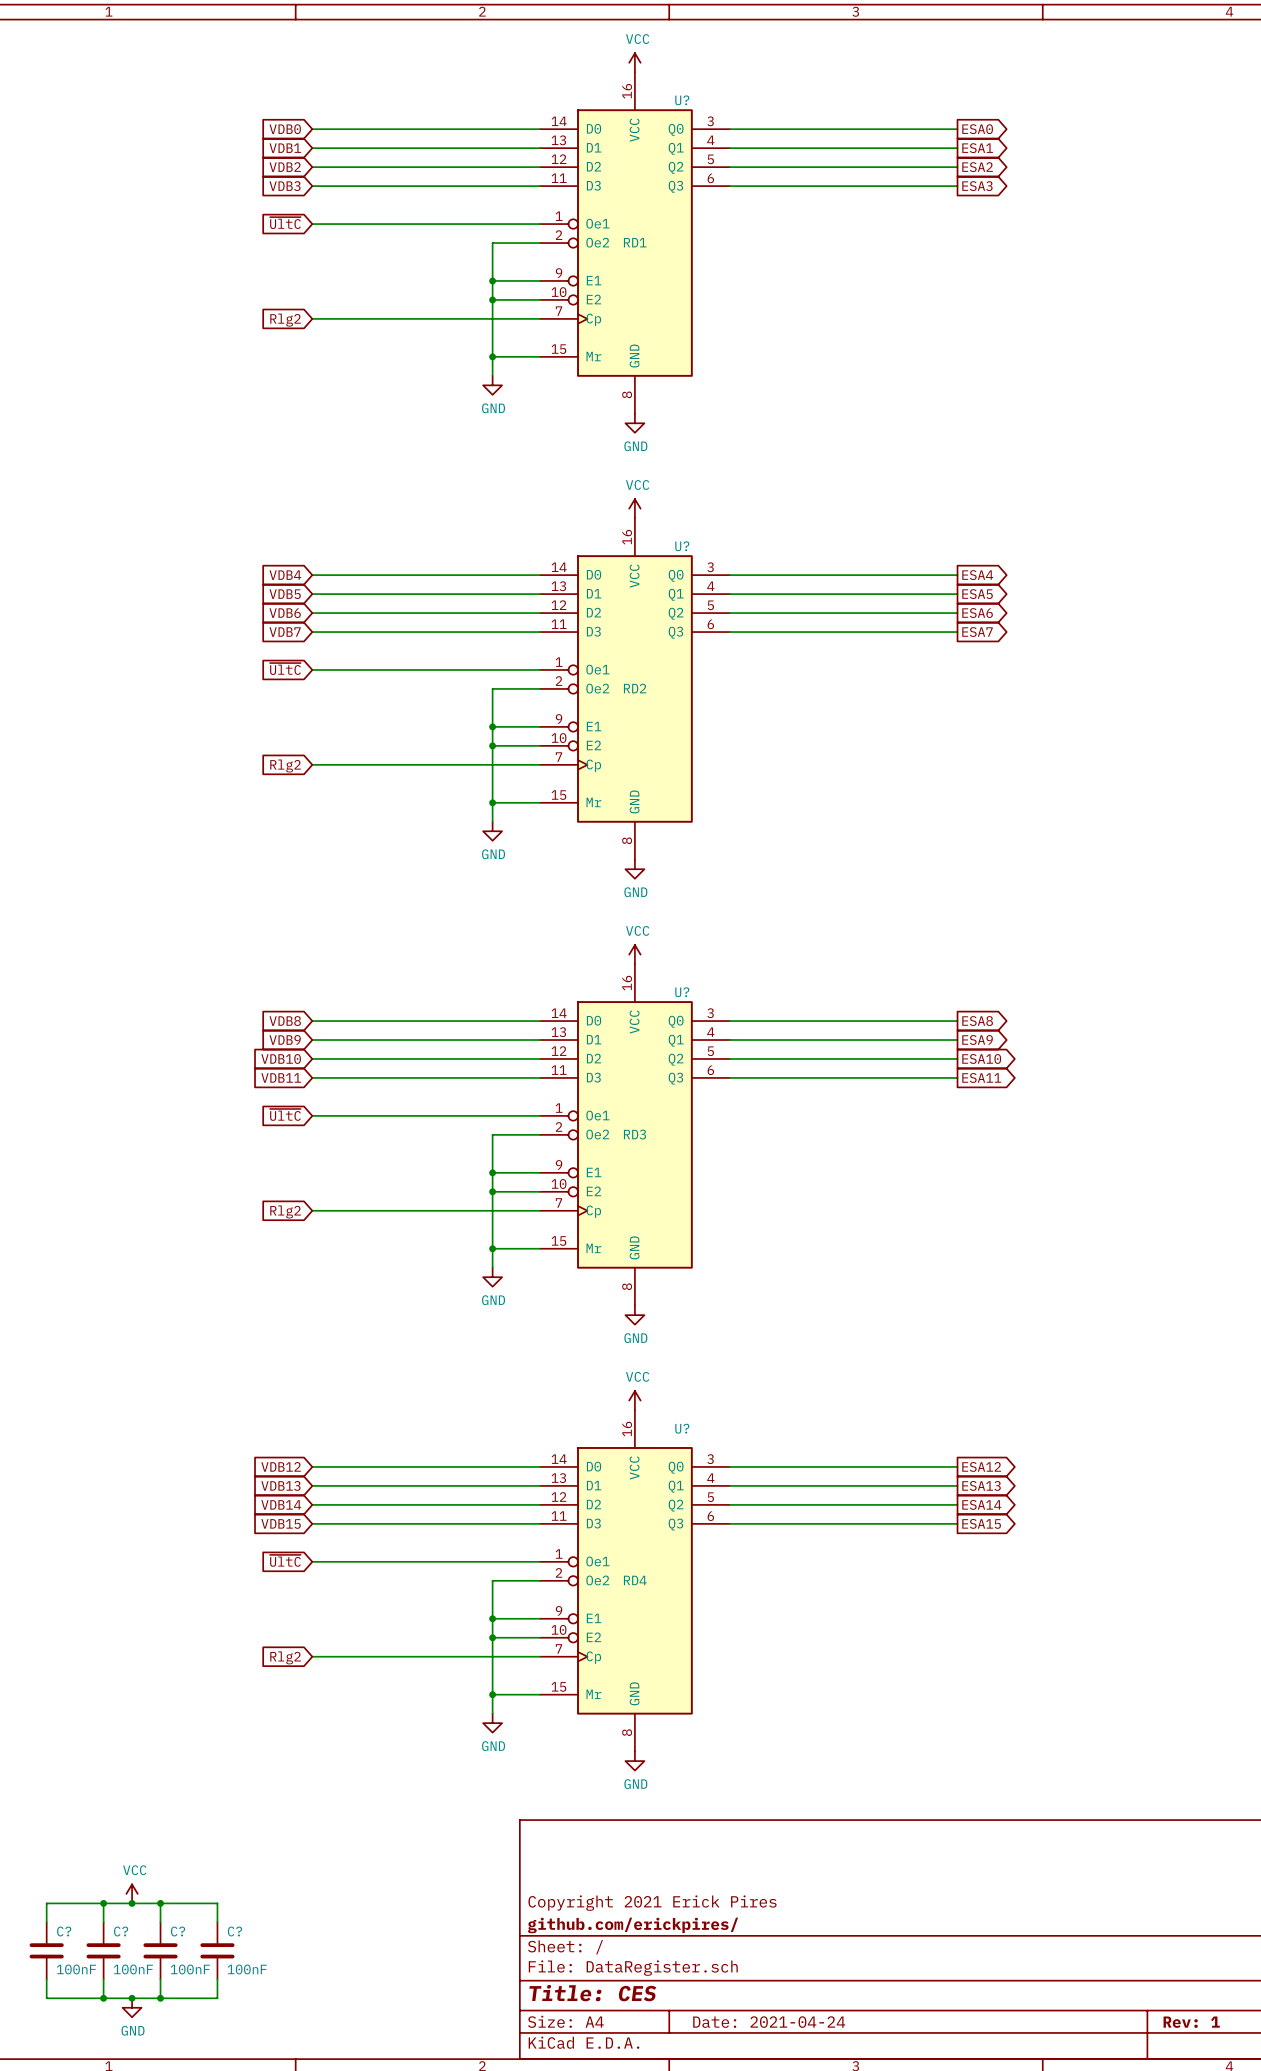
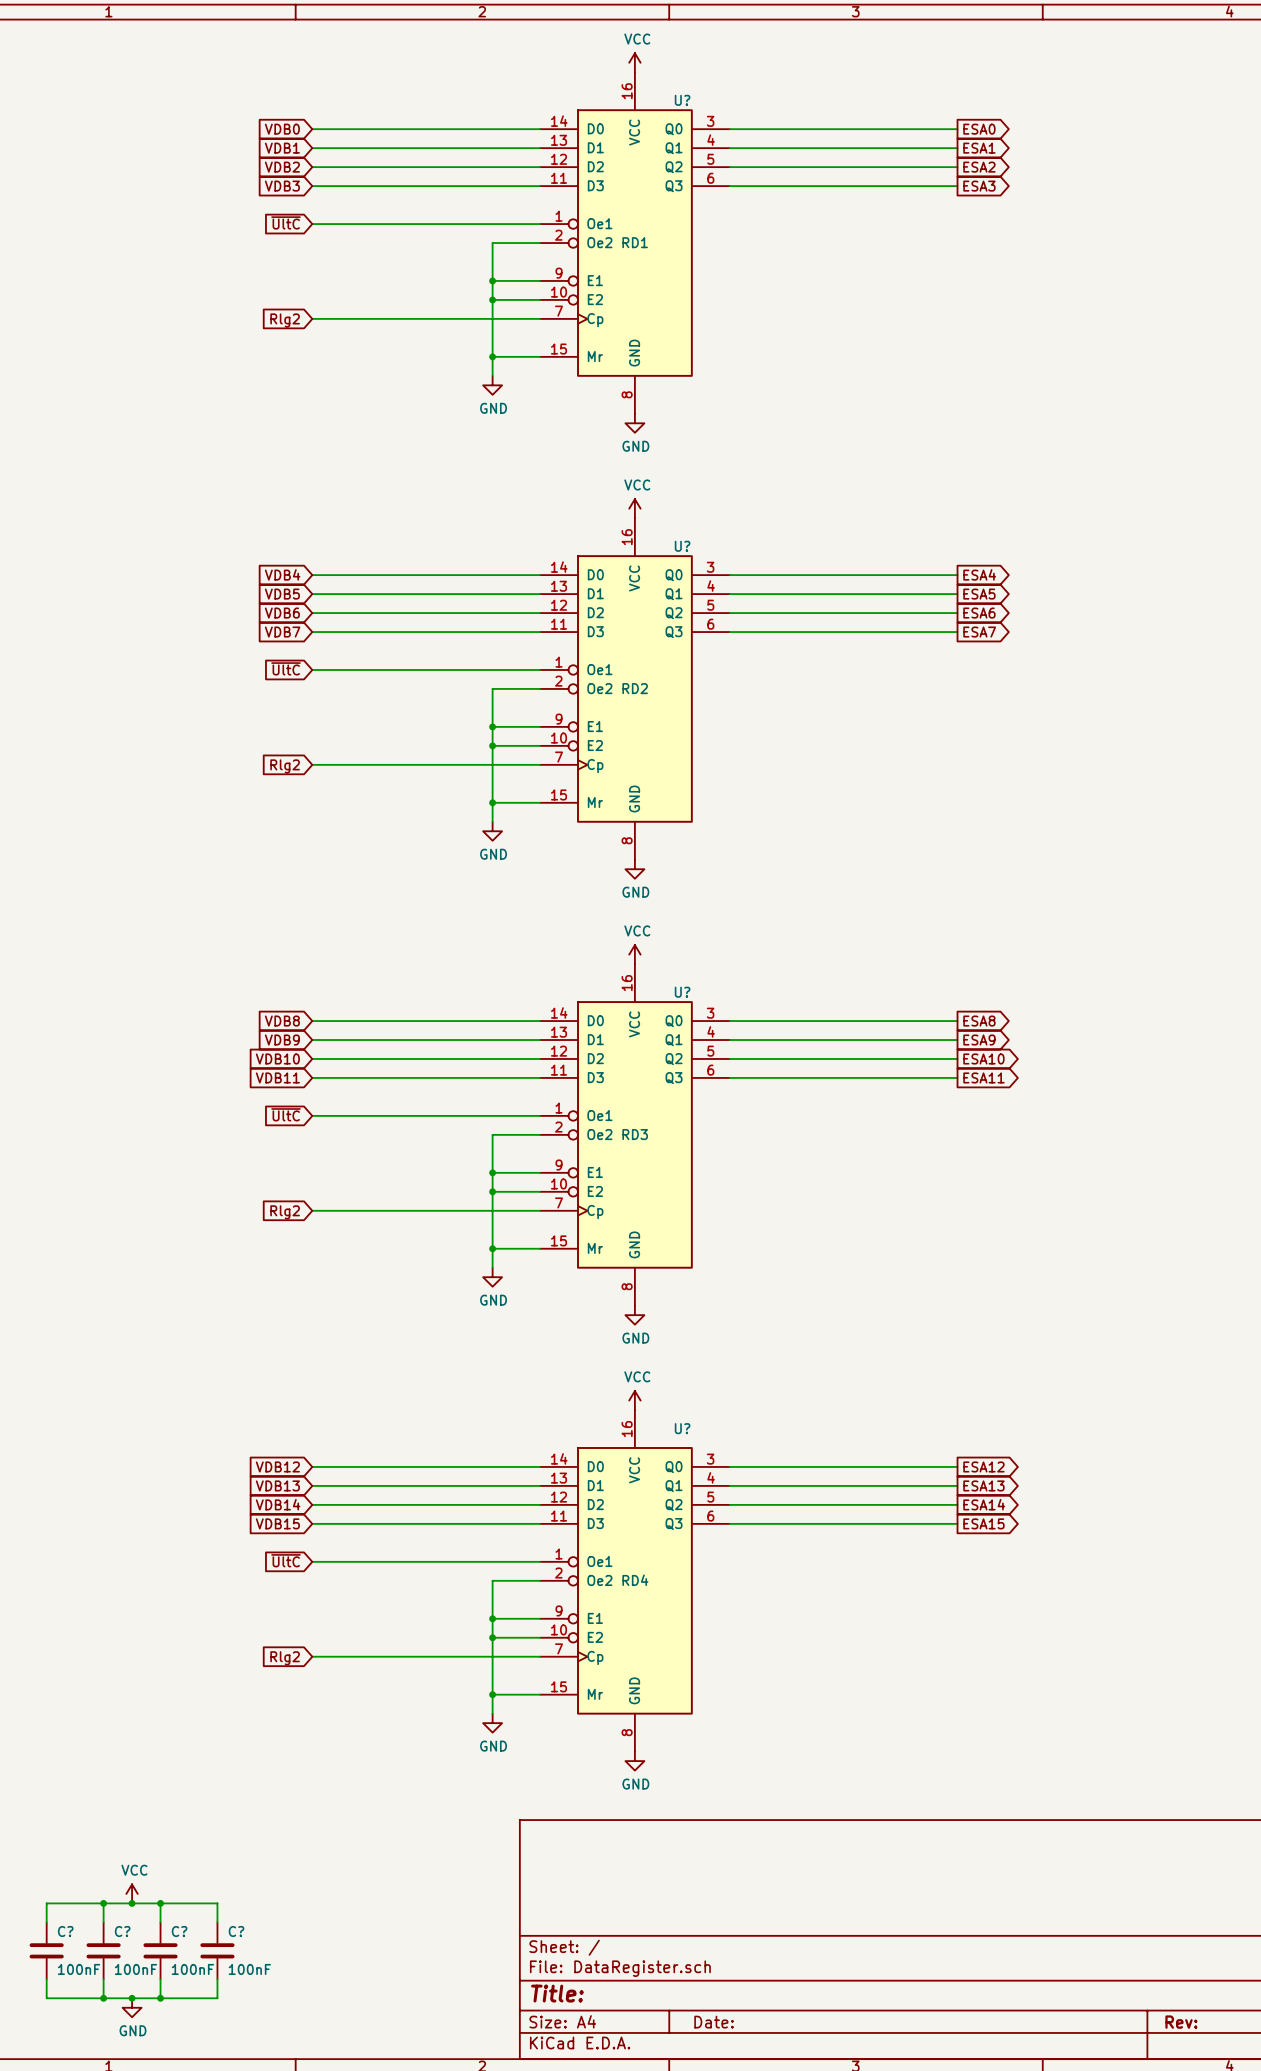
title block: Copyright 2021 Erick Pires (652, 1903) -> none
title block: github.com/erickpires/ (633, 1925) -> none
title block: Title: CES (592, 1993) -> Title: (557, 1993)
title block: Date: 2021-04-24 (769, 2022) -> Date: (714, 2022)
title block: Rev: 1 (1191, 2022) -> Rev: (1181, 2022)

